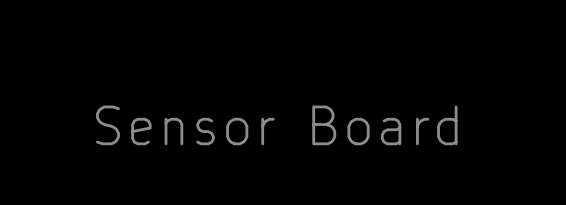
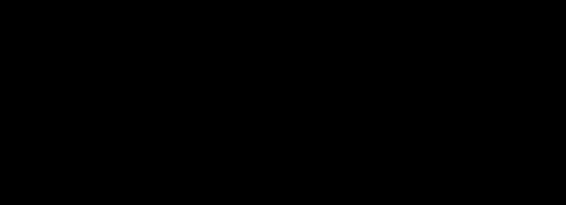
text: Sensor Board (276, 125) -> none

